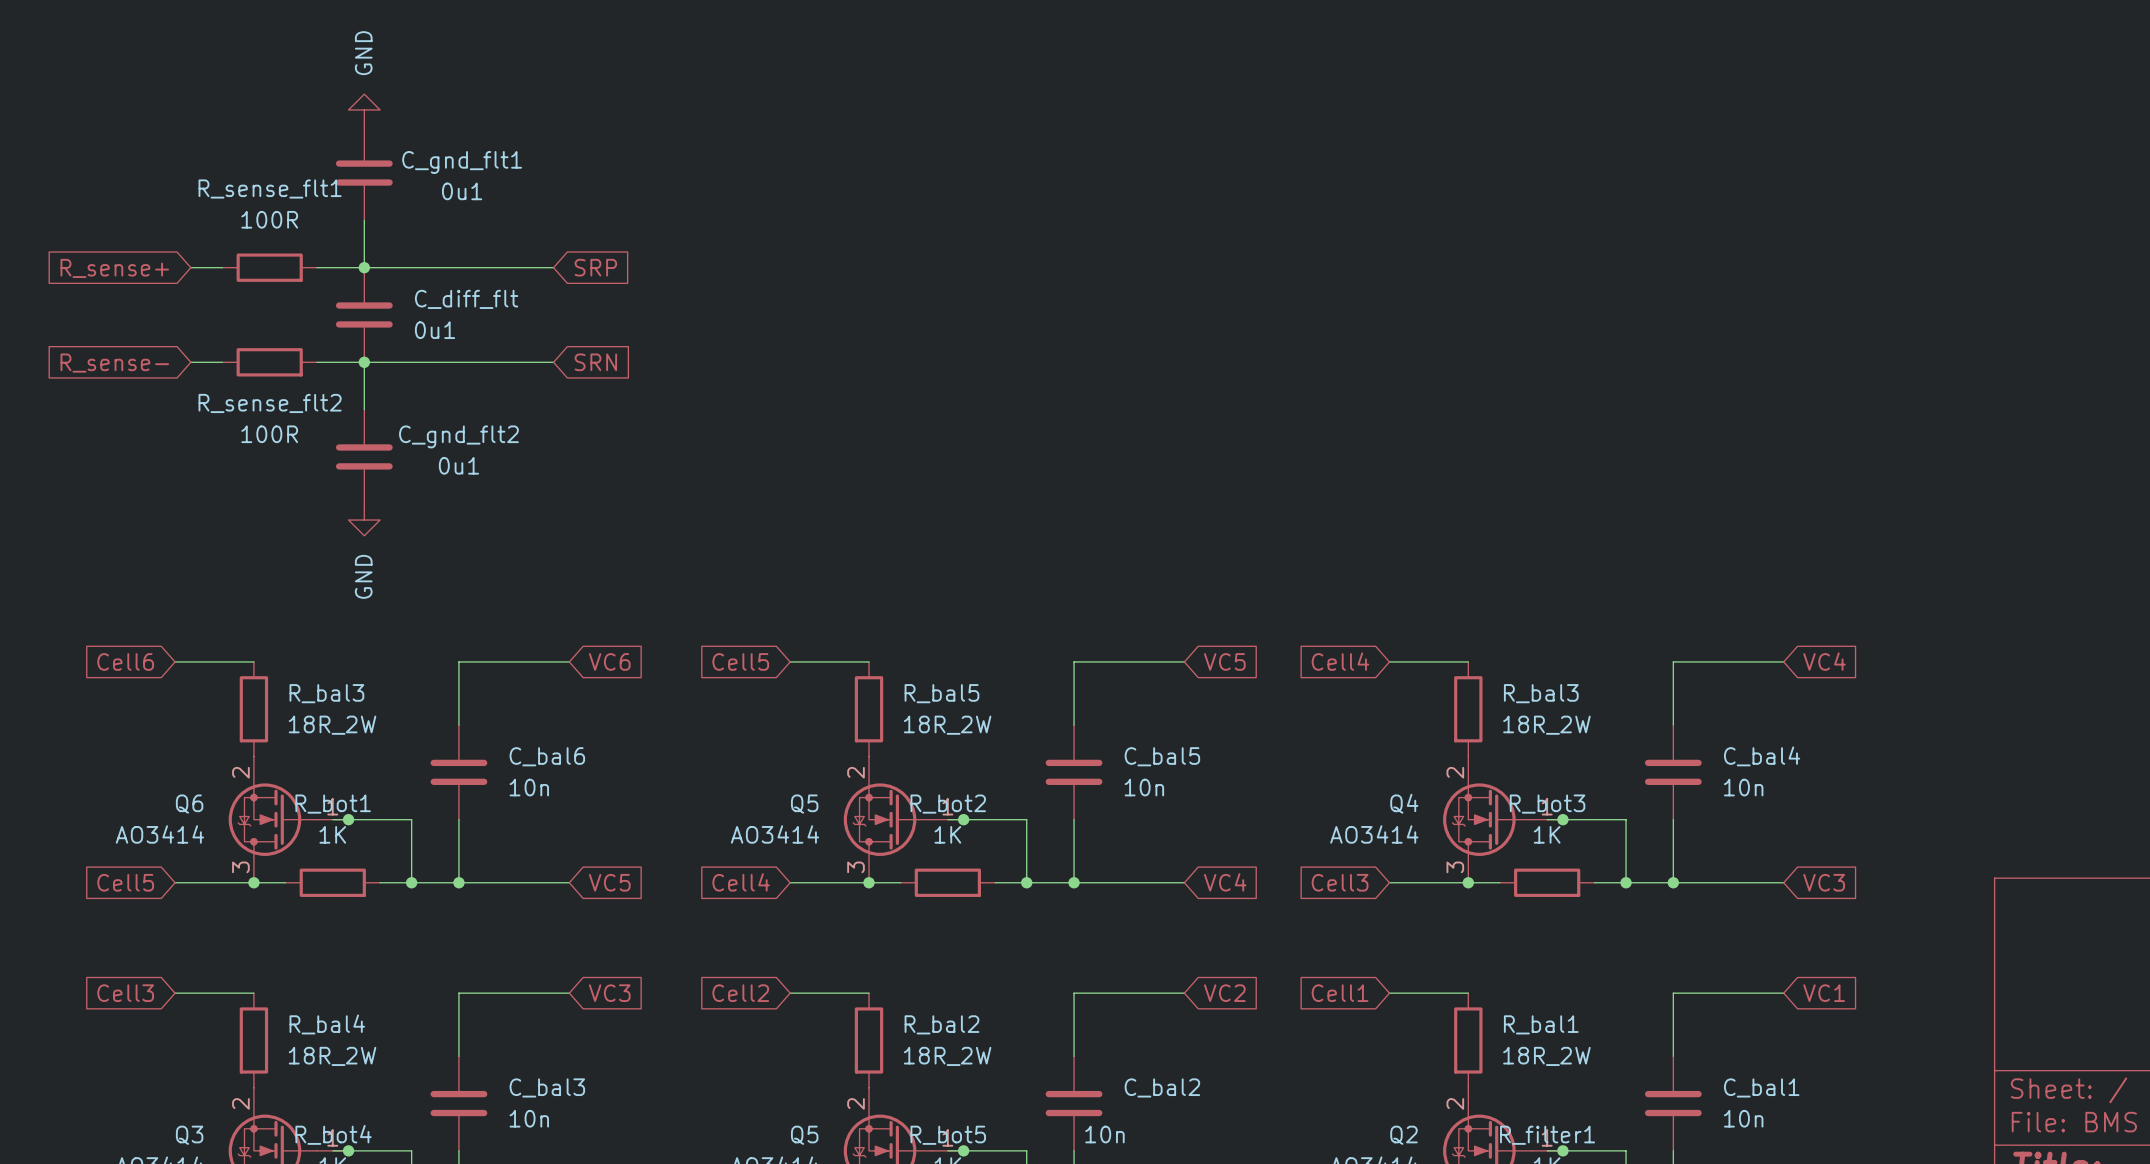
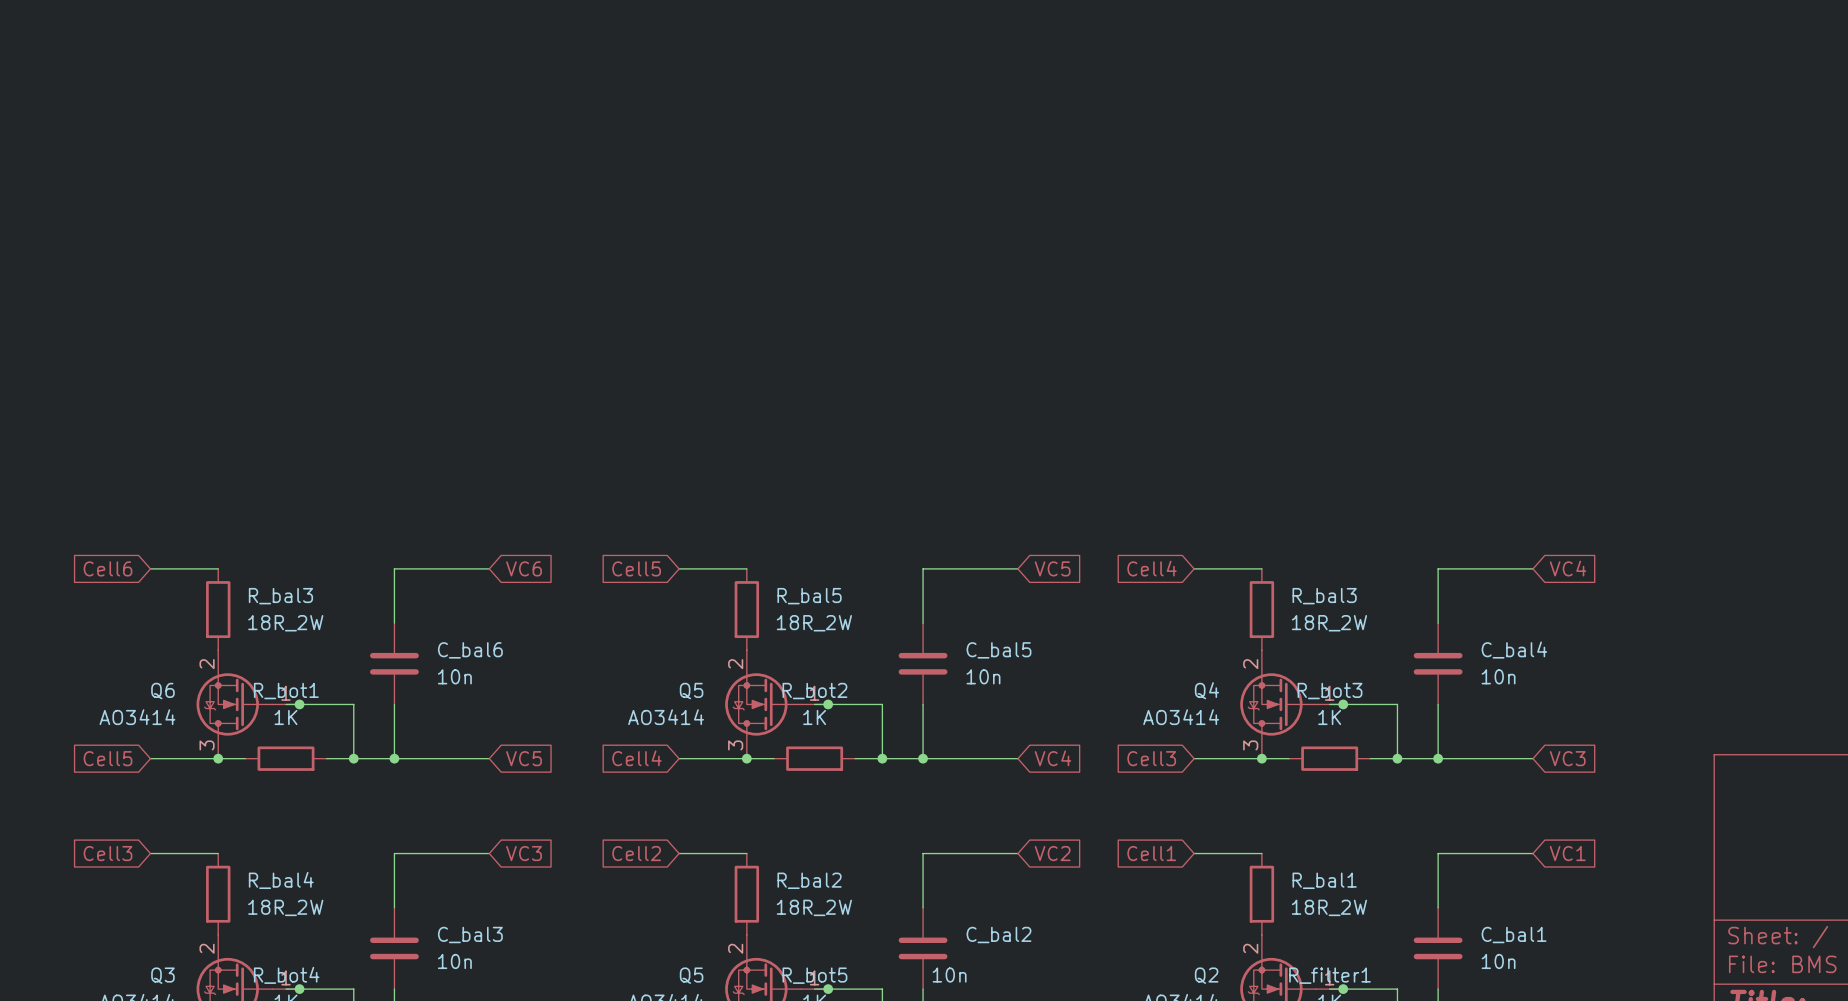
power symbol: GND (364, 109) -> none
C_gnd_flt1: 0u1 (364, 173) -> none
wire: (364, 220) (364, 267) -> none
wire: (190, 267) (222, 267) -> none
R_sense_flt1: 100R (269, 267) -> none
wire: (317, 267) (553, 267) -> none
junction: (364, 267) -> none
global label: SRP (595, 267) -> none
global label: R_sense+ (114, 268) -> none
C_diff_flt: 0u1 (364, 314) -> none
wire: (190, 362) (222, 362) -> none
R_sense_flt2: 100R (269, 362) -> none
wire: (317, 362) (553, 362) -> none
wire: (364, 362) (364, 409) -> none
junction: (364, 362) -> none
global label: SRN (595, 362) -> none
global label: R_sense- (114, 363) -> none
C_gnd_flt2: 0u1 (364, 456) -> none
power symbol: GND (364, 520) -> none

